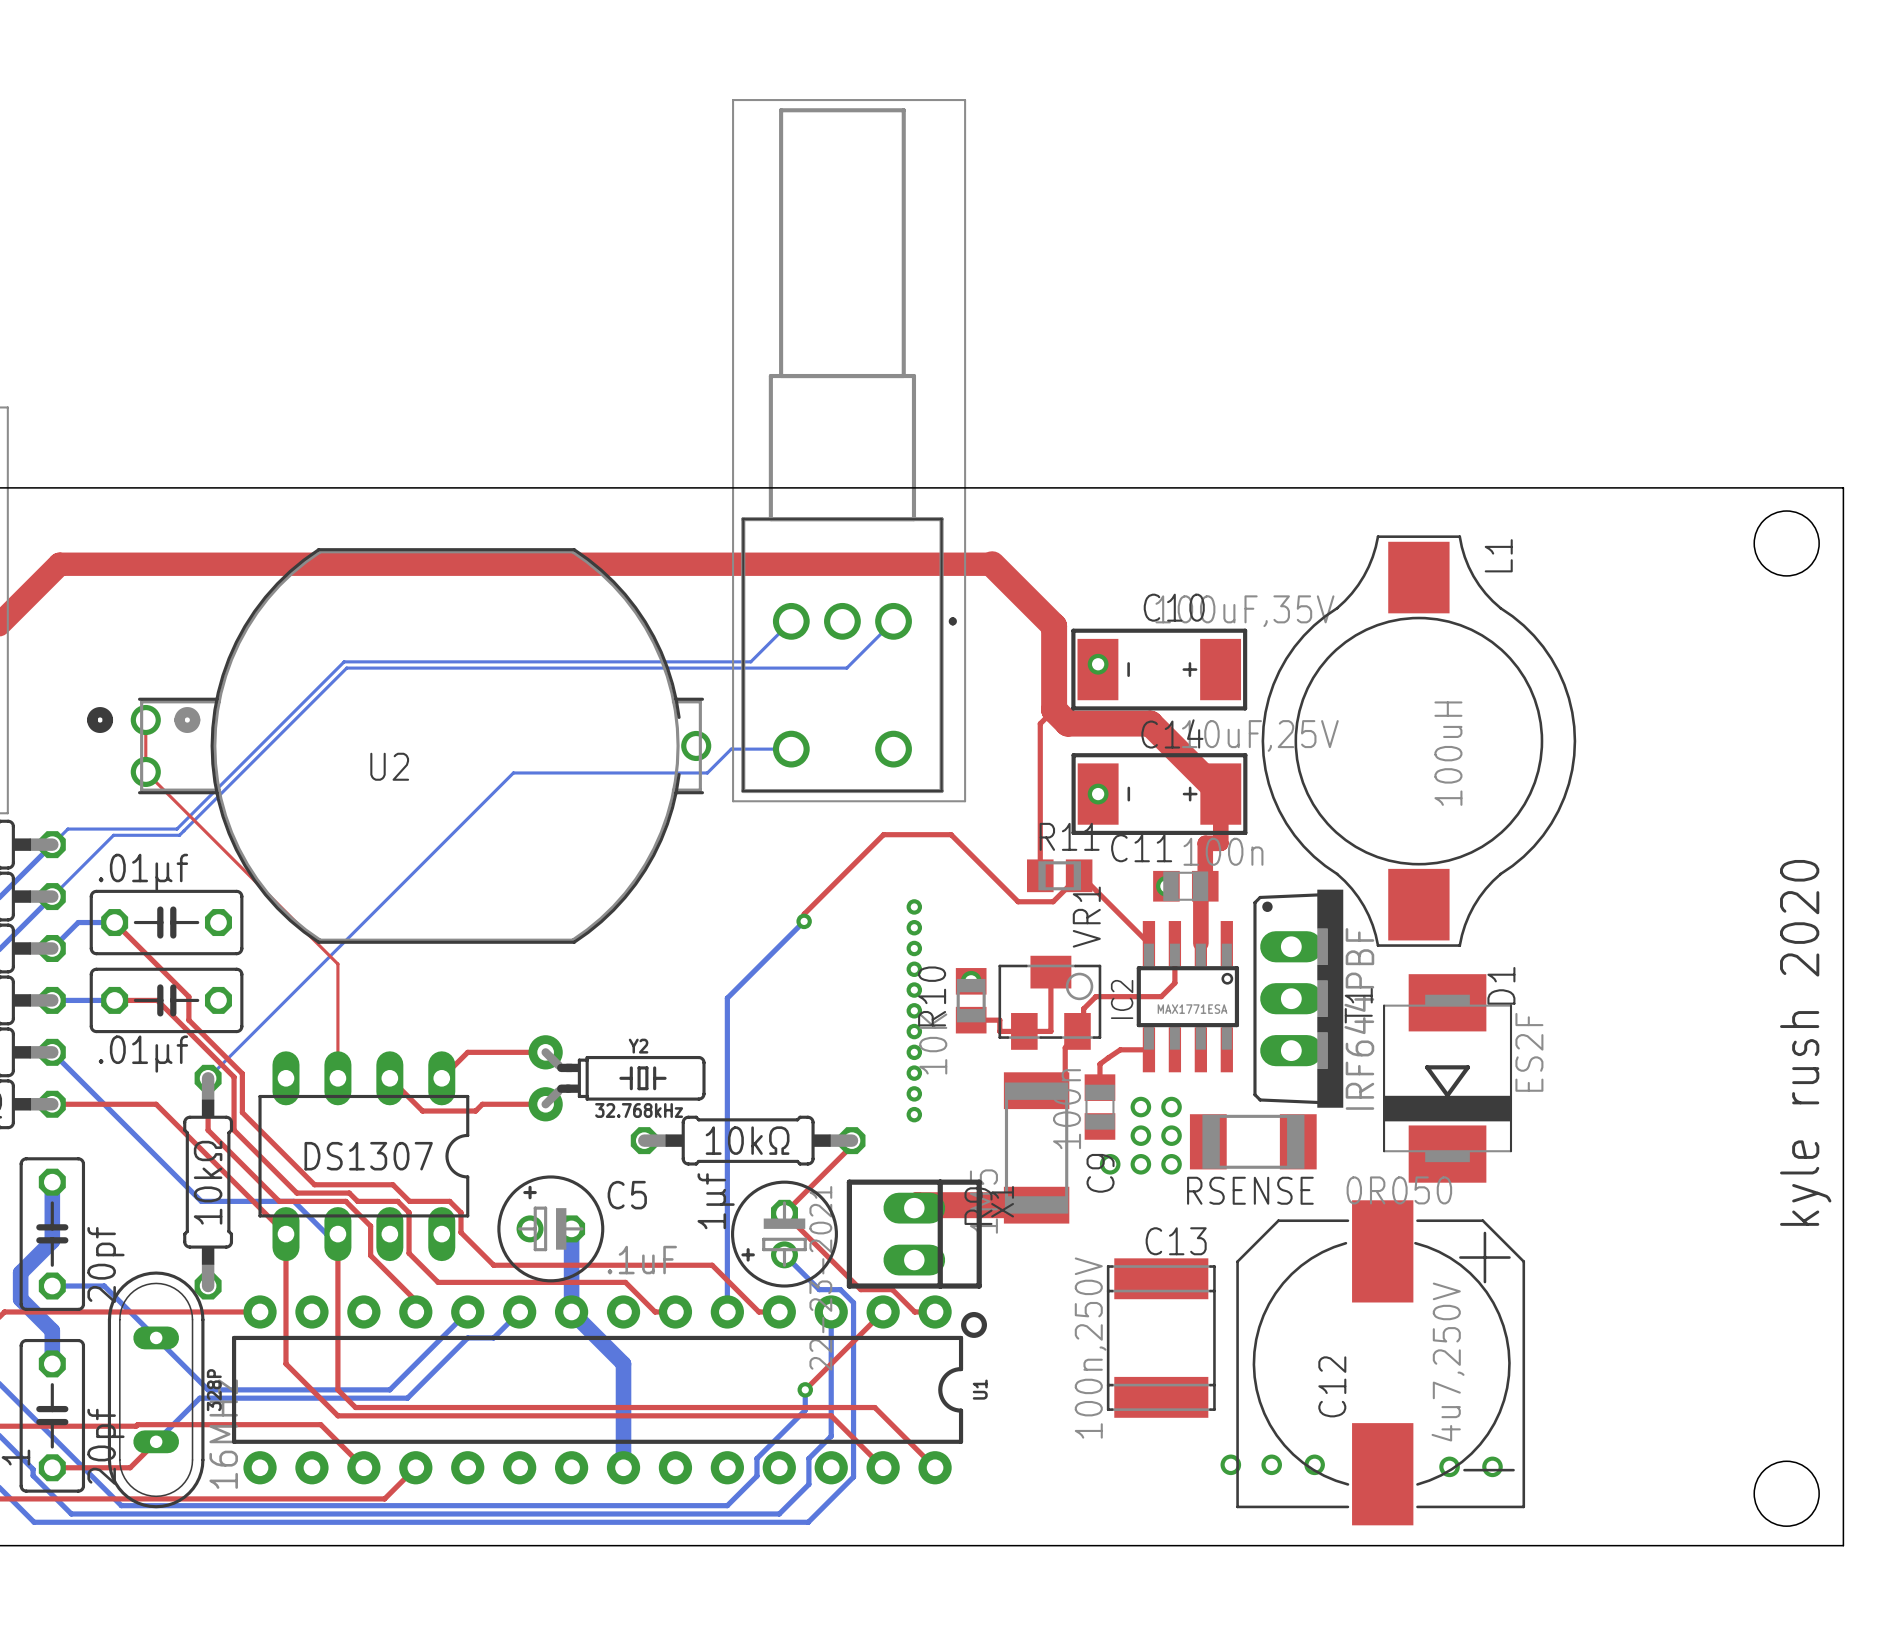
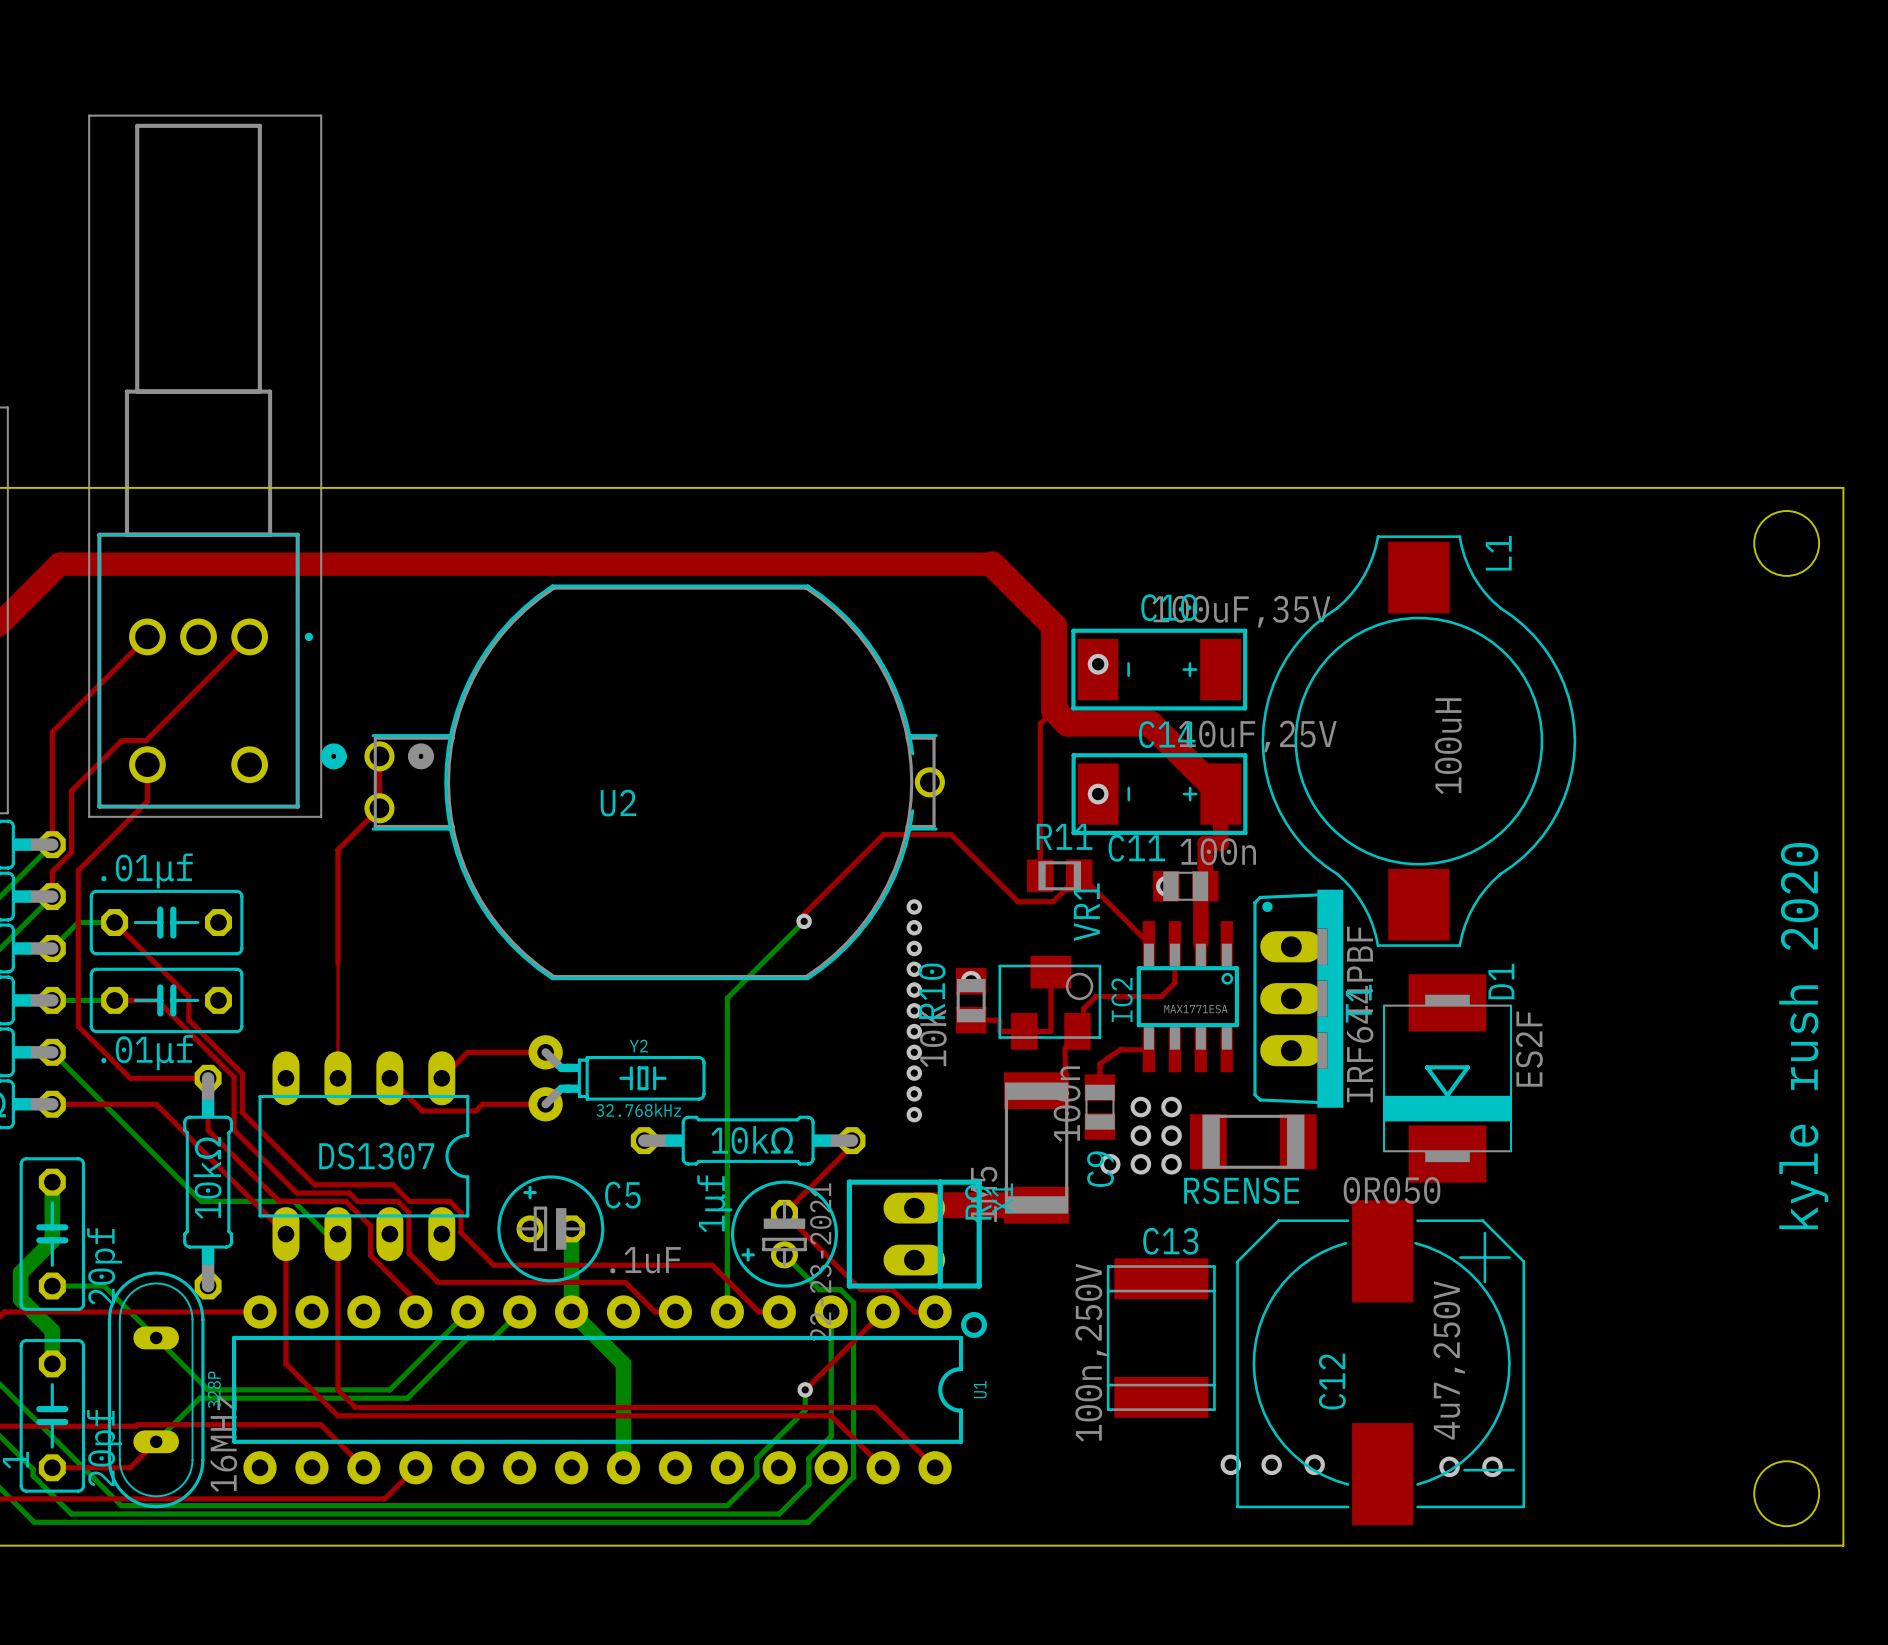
part: (849, 450) -> none
part: none -> (205, 466)
bottom track: (791, 621) (750, 661) (344, 661) (176, 829) (67, 829) (52, 844) -> none
bottom track: (893, 621) (846, 668) (346, 668) (179, 835) (113, 835) (52, 896) -> none
top track: none -> (147, 636) (52, 732) (52, 844)
top track: none -> (249, 636) (145, 740) (121, 740) (71, 790) (71, 852) (52, 871) (52, 896)
top track: (145, 720) (145, 771) (337, 964) -> (379, 756) (379, 808) (337, 849) (337, 964)
U2 position: (399, 745) -> (632, 782)
bottom track: (791, 749) (731, 749) (707, 772) (513, 772) (208, 1078) -> none
top track: none -> (147, 764) (147, 801) (78, 870) (78, 1026) (130, 1078) (208, 1078)

